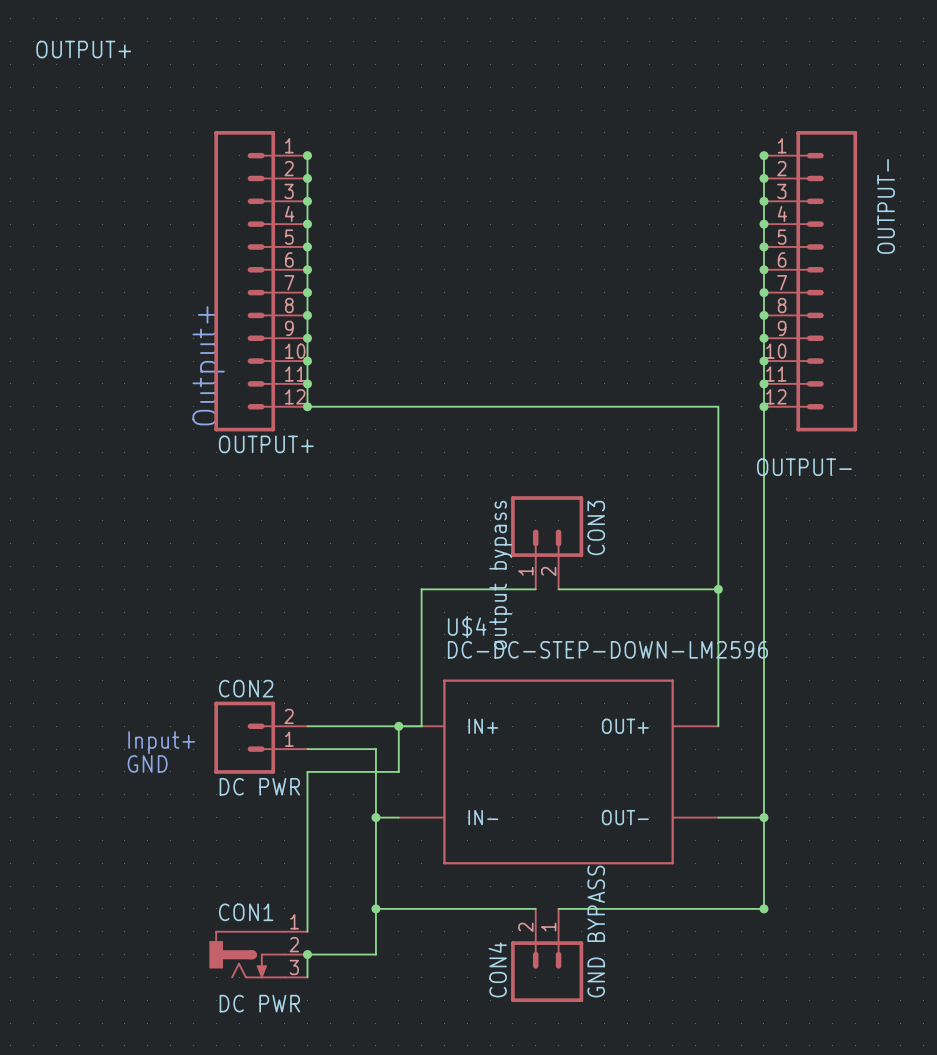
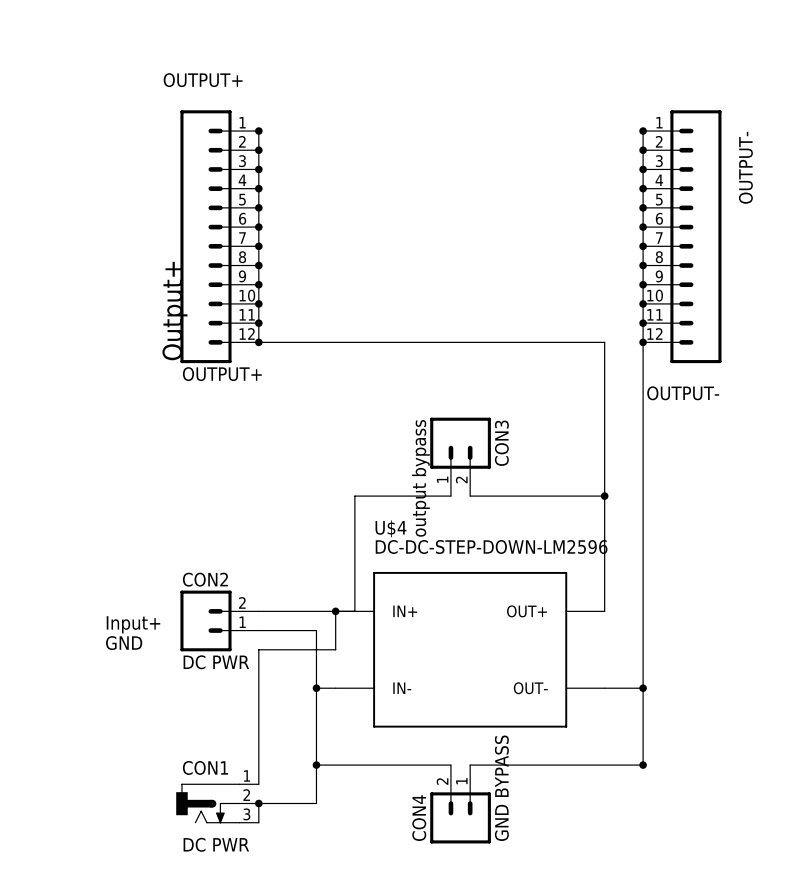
OUTPUT+ value position: OUTPUT+ (83, 49) -> OUTPUT+ (203, 80)

